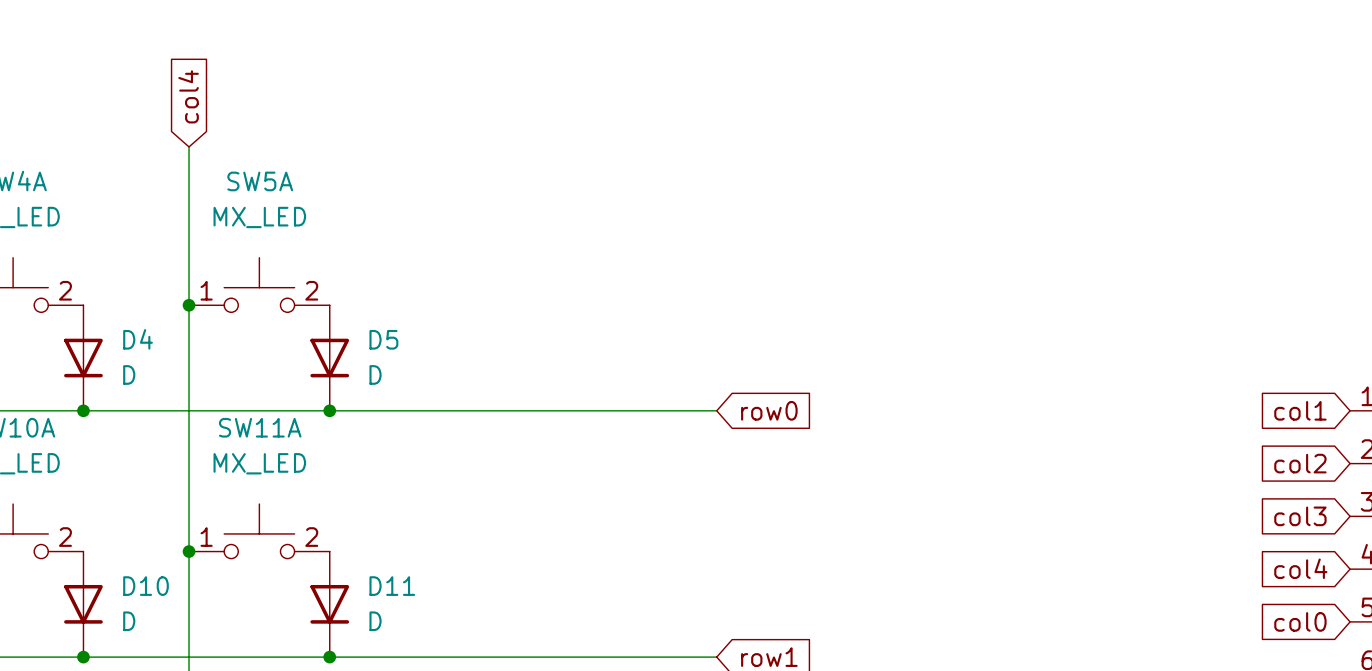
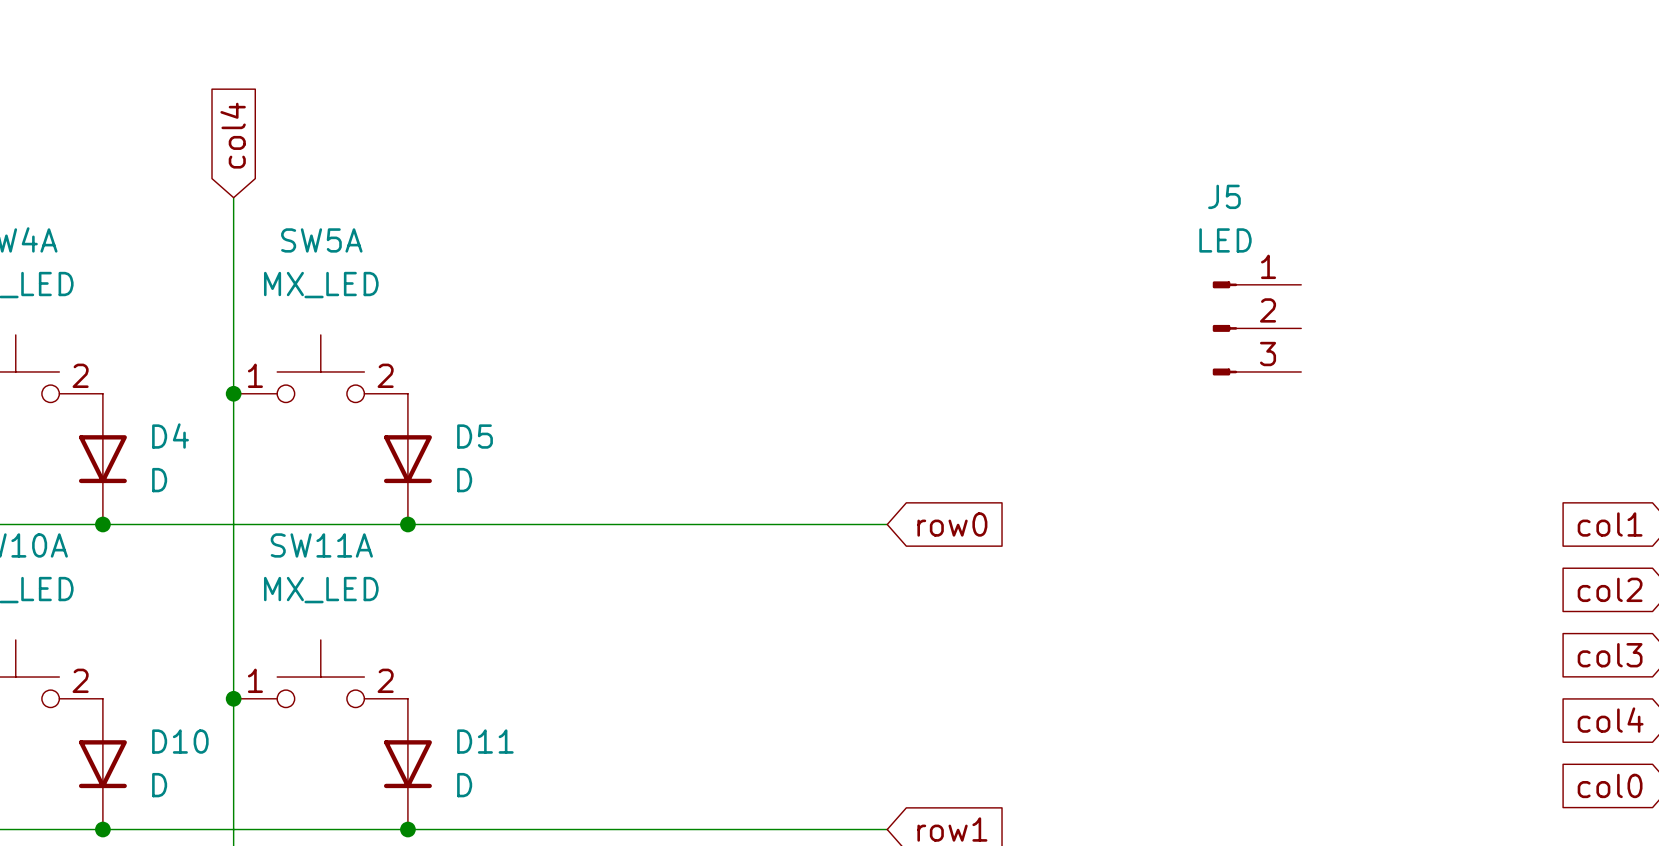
J5: none -> LED (1256, 328)

